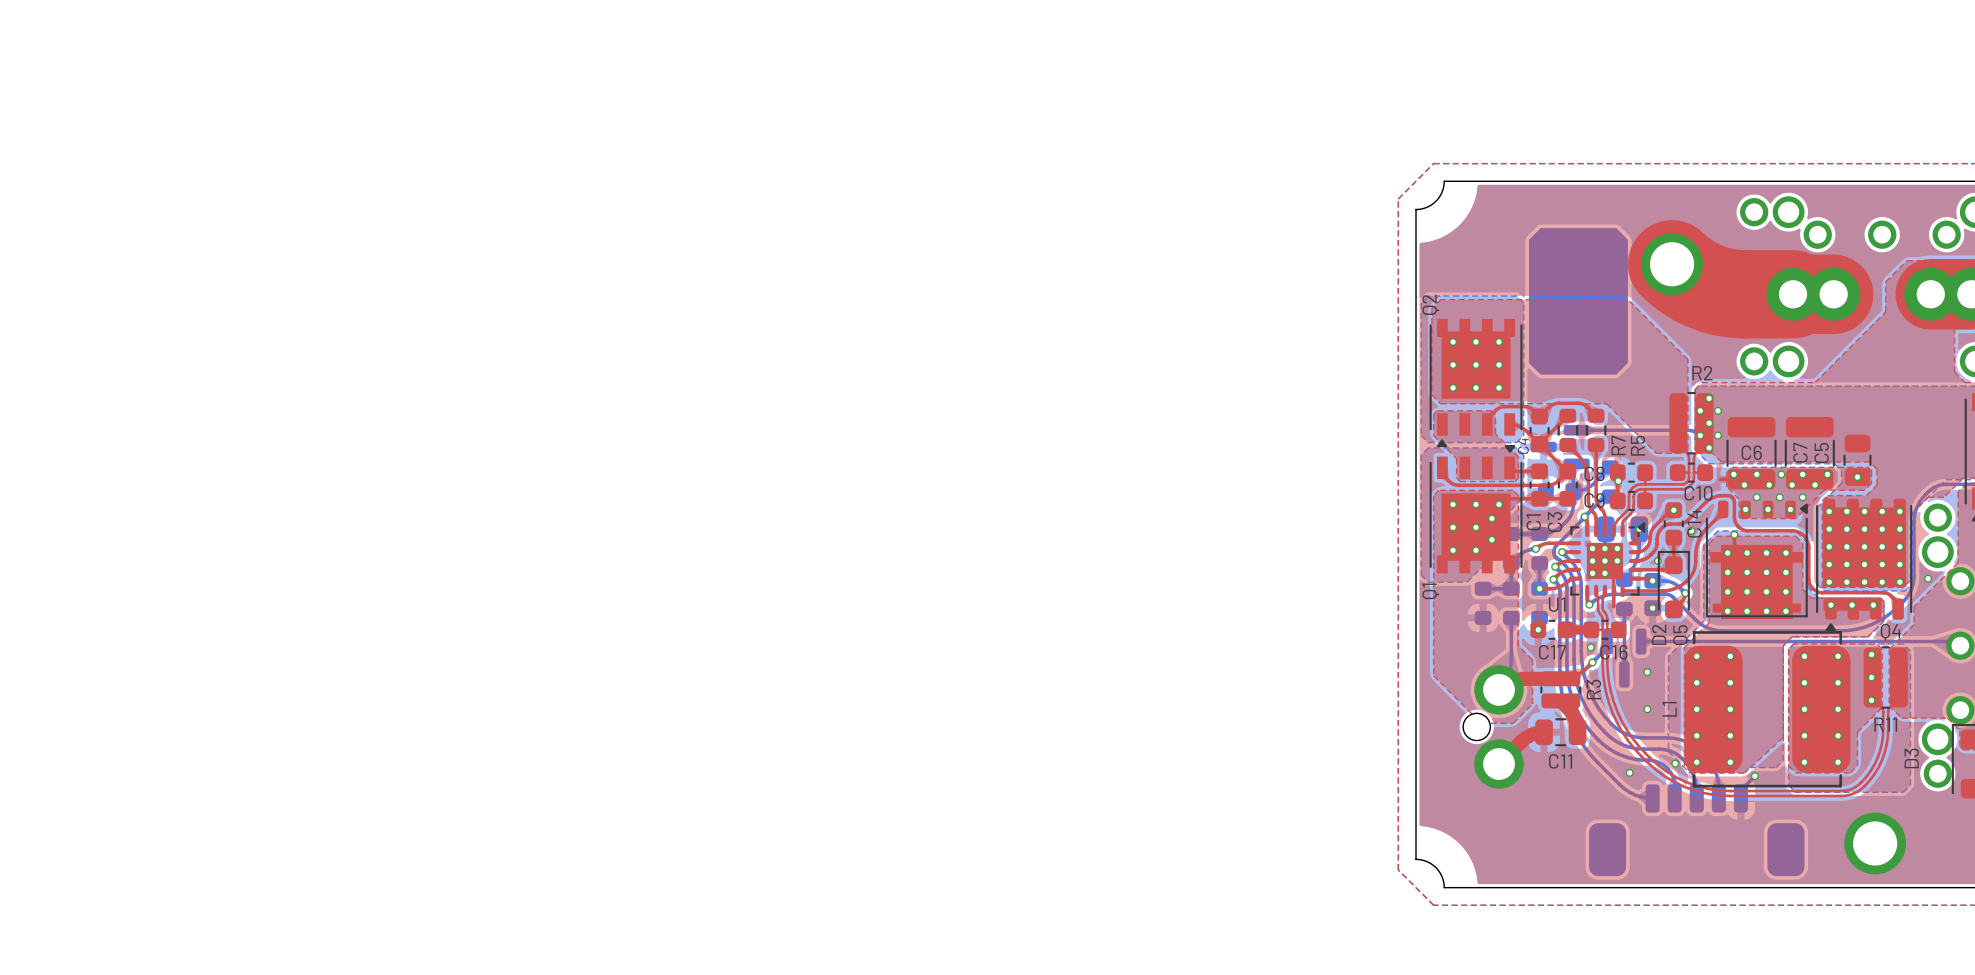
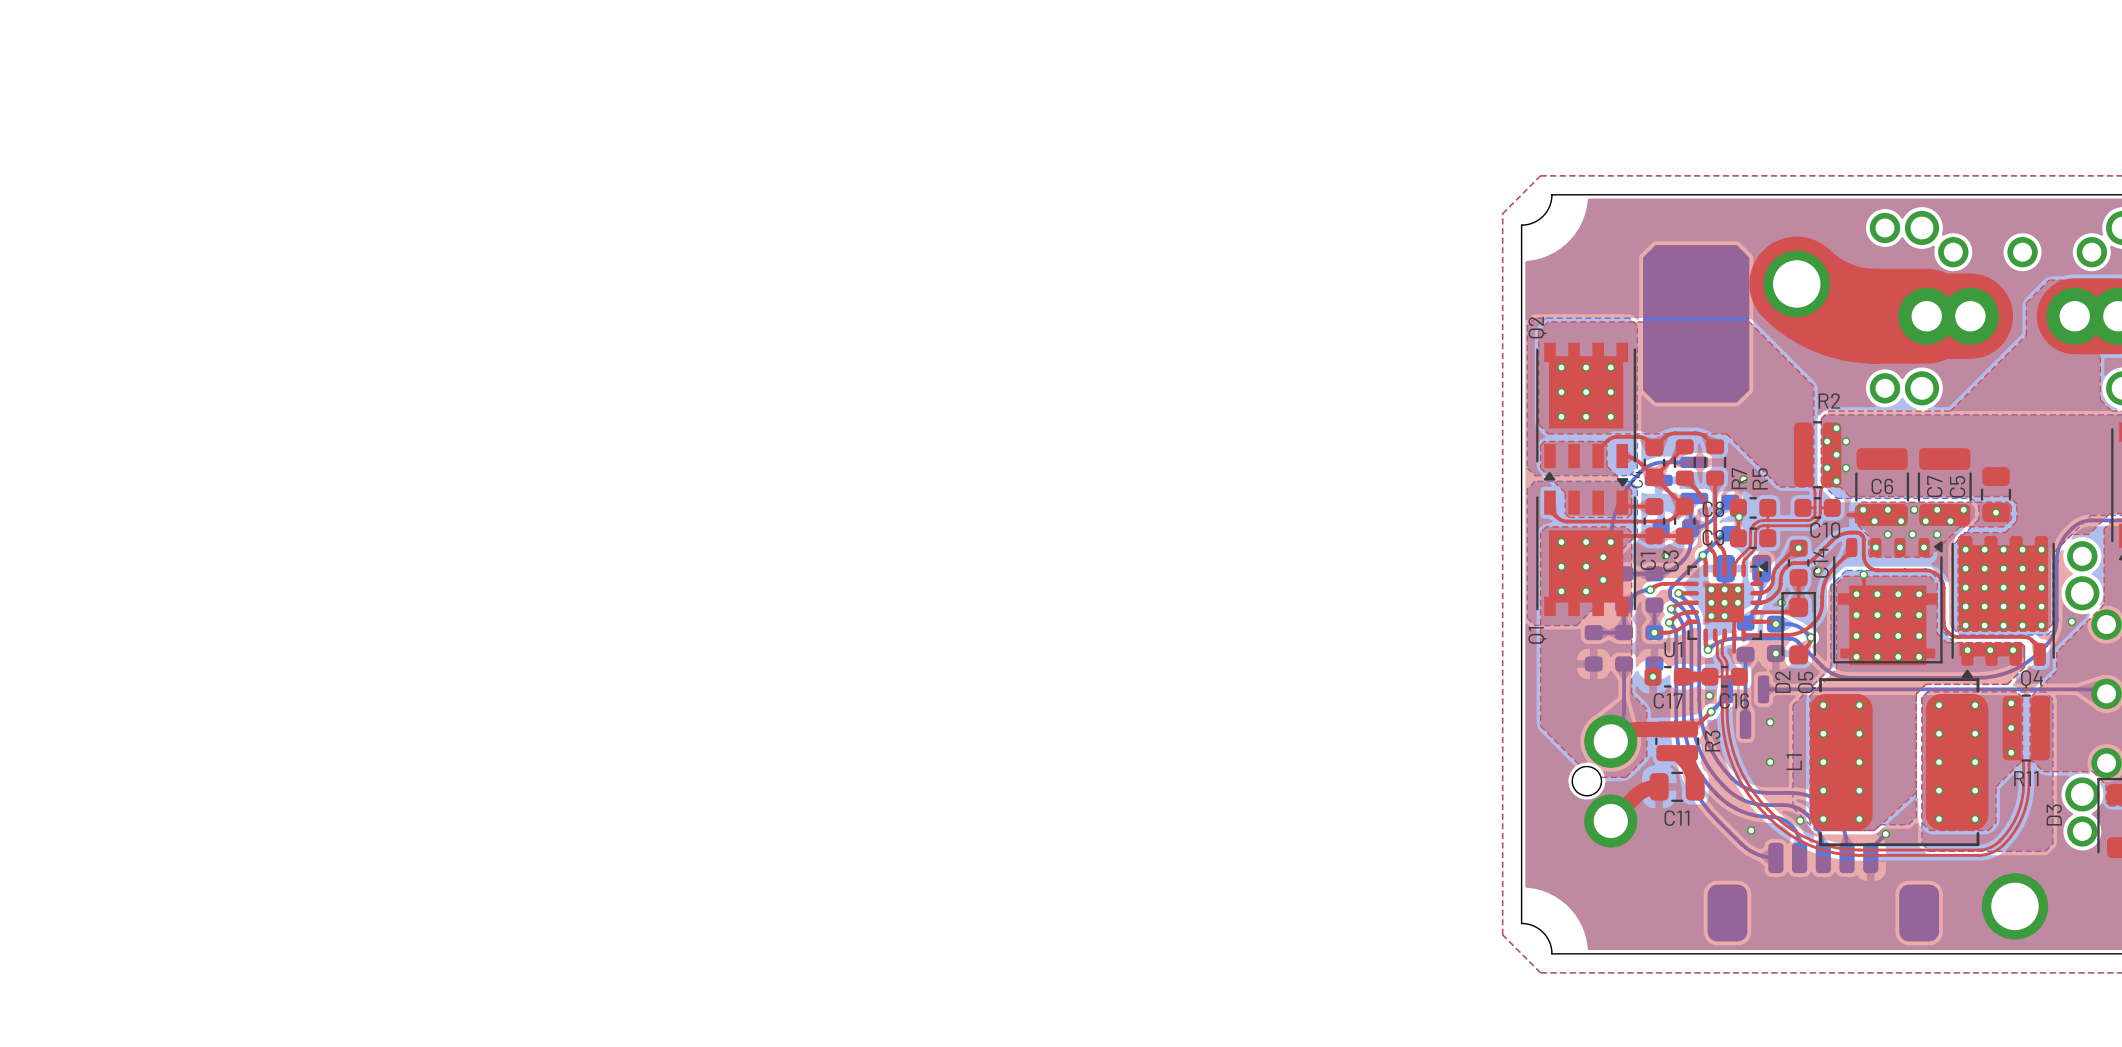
bottom track: (1576, 430) (1687, 430) (1700, 435) -> (1694, 462) (1659, 462) (1651, 464) (1640, 471) (1627, 488) (1618, 504) (1612, 523) (1610, 542)
via: none -> (1743, 479)
via: none -> (1665, 555)

